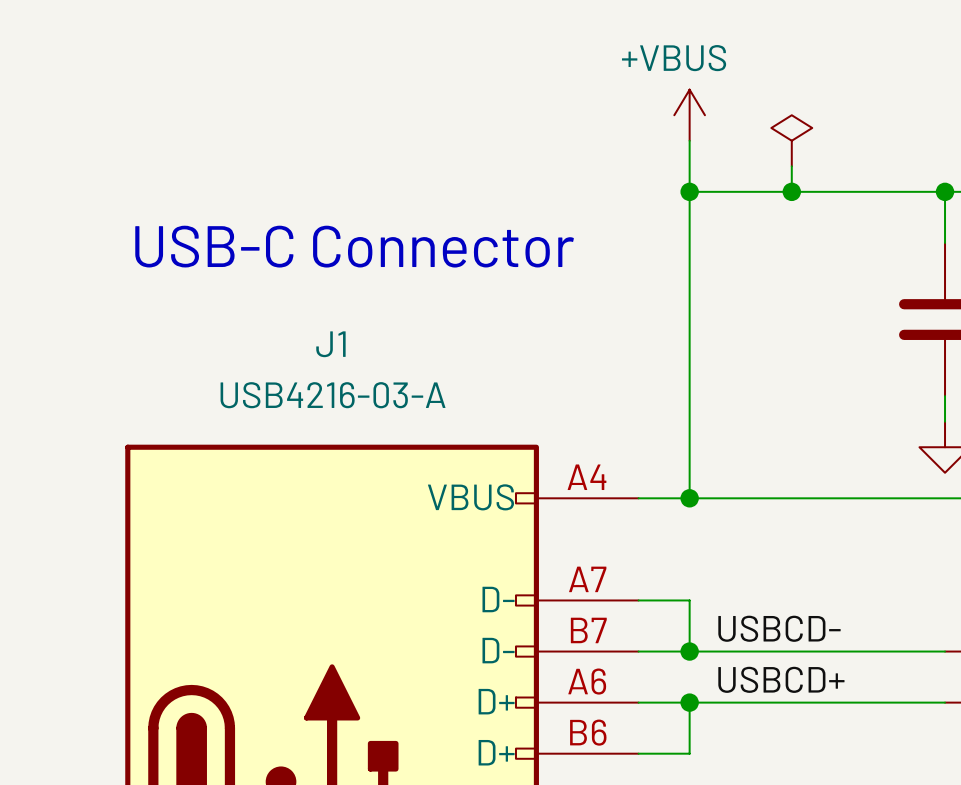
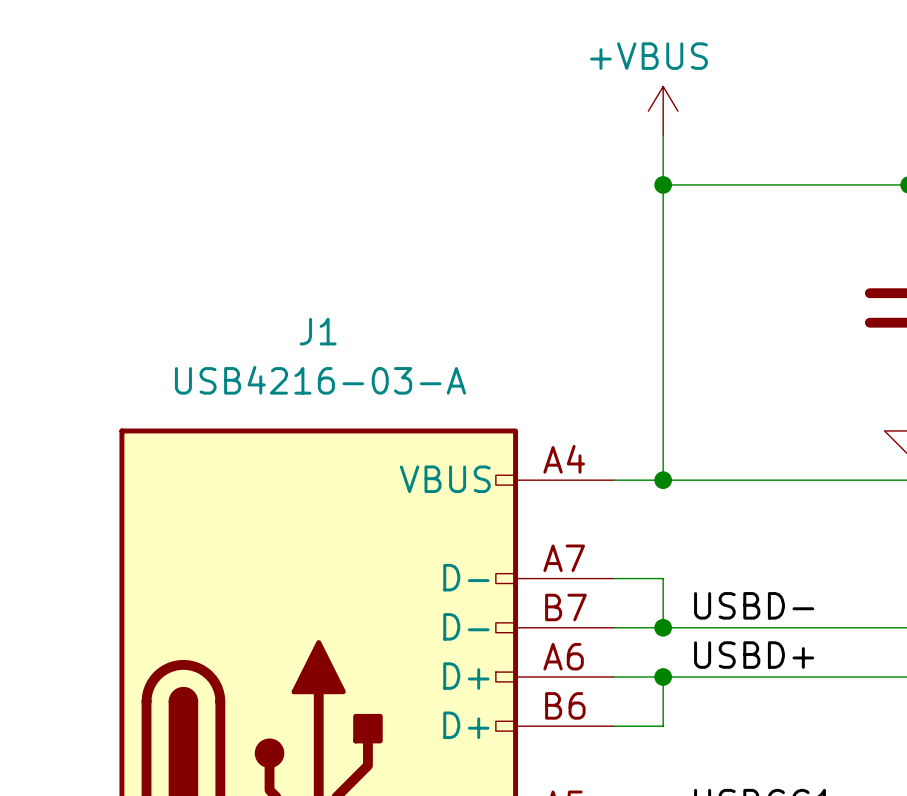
power symbol: (791, 140) -> none
wire: (791, 166) (791, 191) -> none
junction: (791, 191) -> none
text: USB-C Connector (354, 246) -> none
label: USBCD- (779, 628) -> USBD- (754, 605)
label: USBCD+ (781, 679) -> USBD+ (754, 655)

